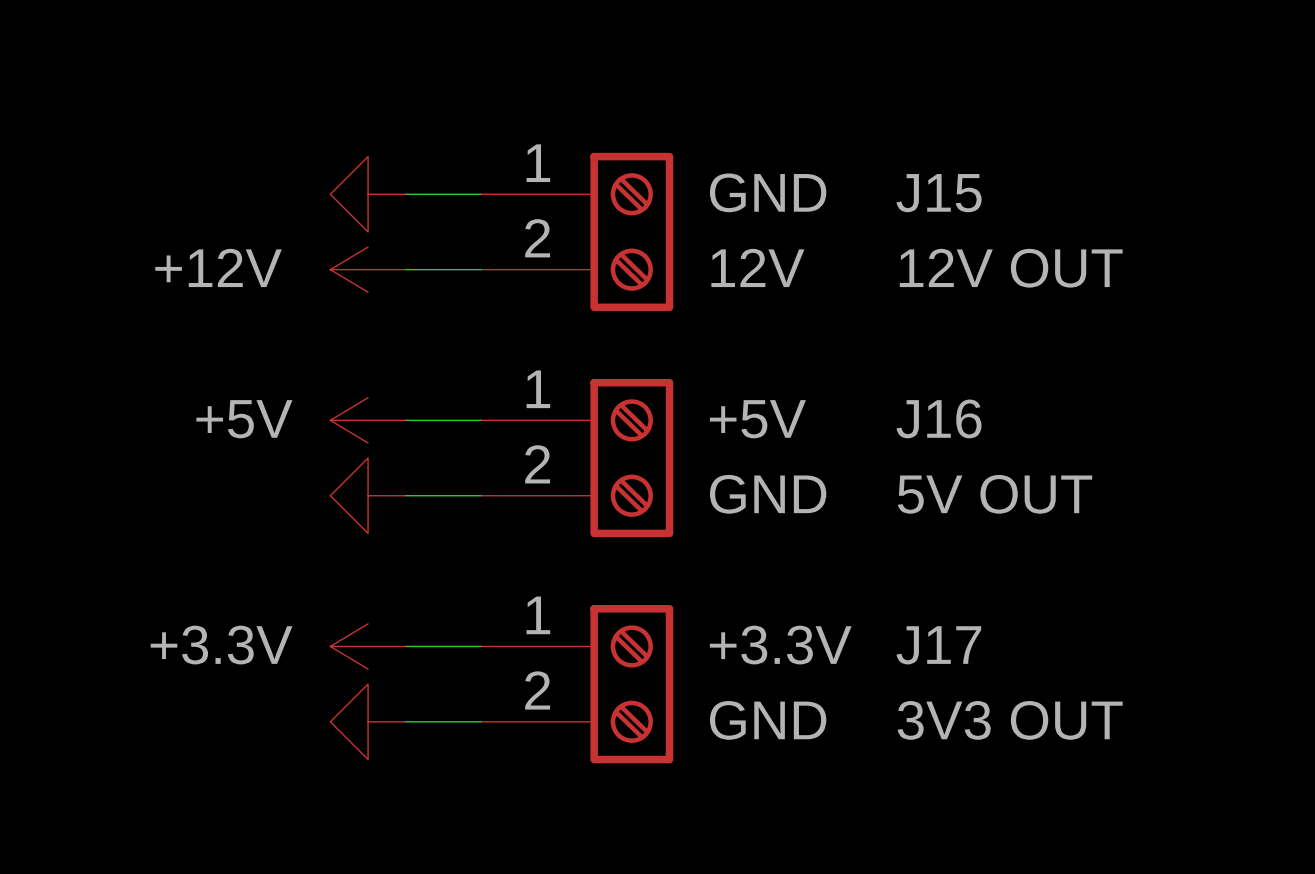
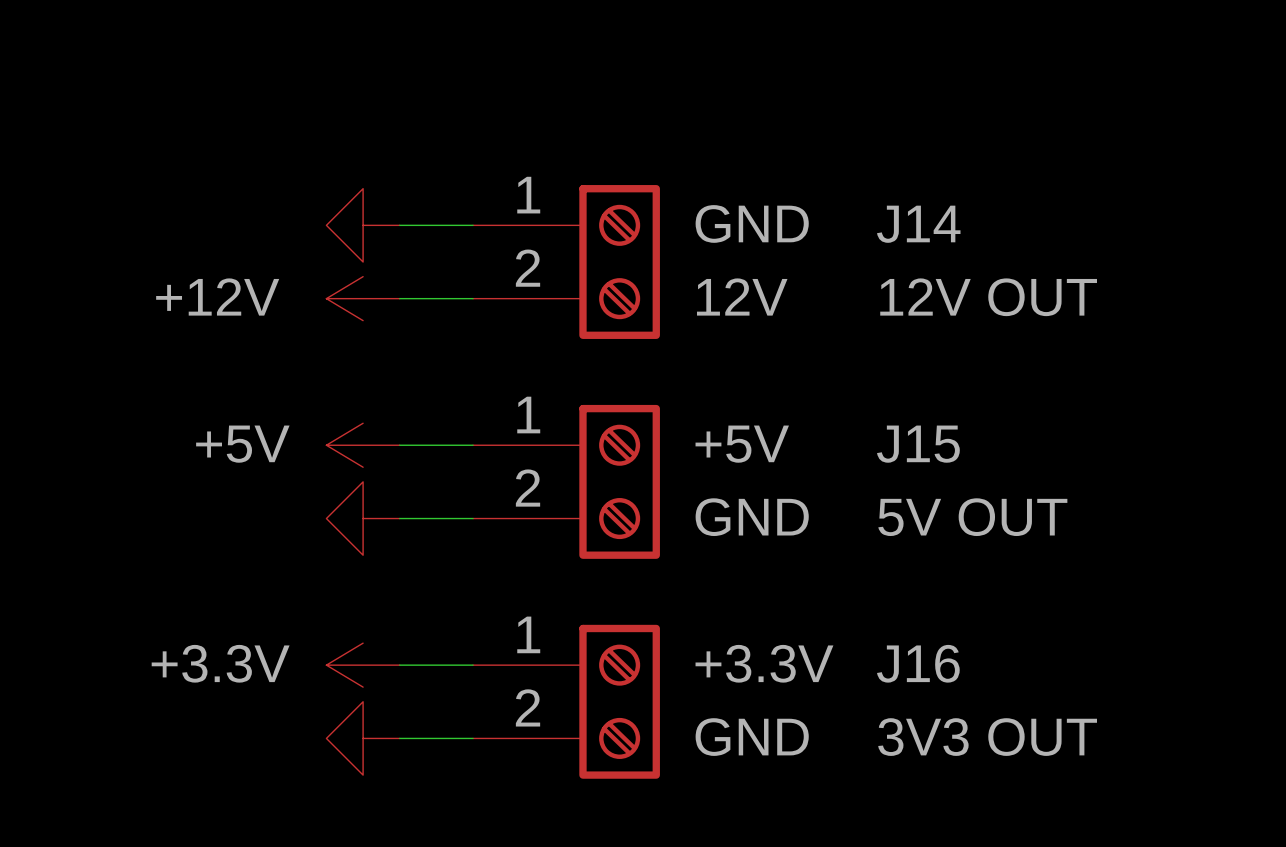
J15 name: J15 (939, 193) -> J14 (918, 224)
J16 name: J16 (938, 418) -> J15 (918, 444)
J17 name: J17 (938, 645) -> J16 (918, 663)

